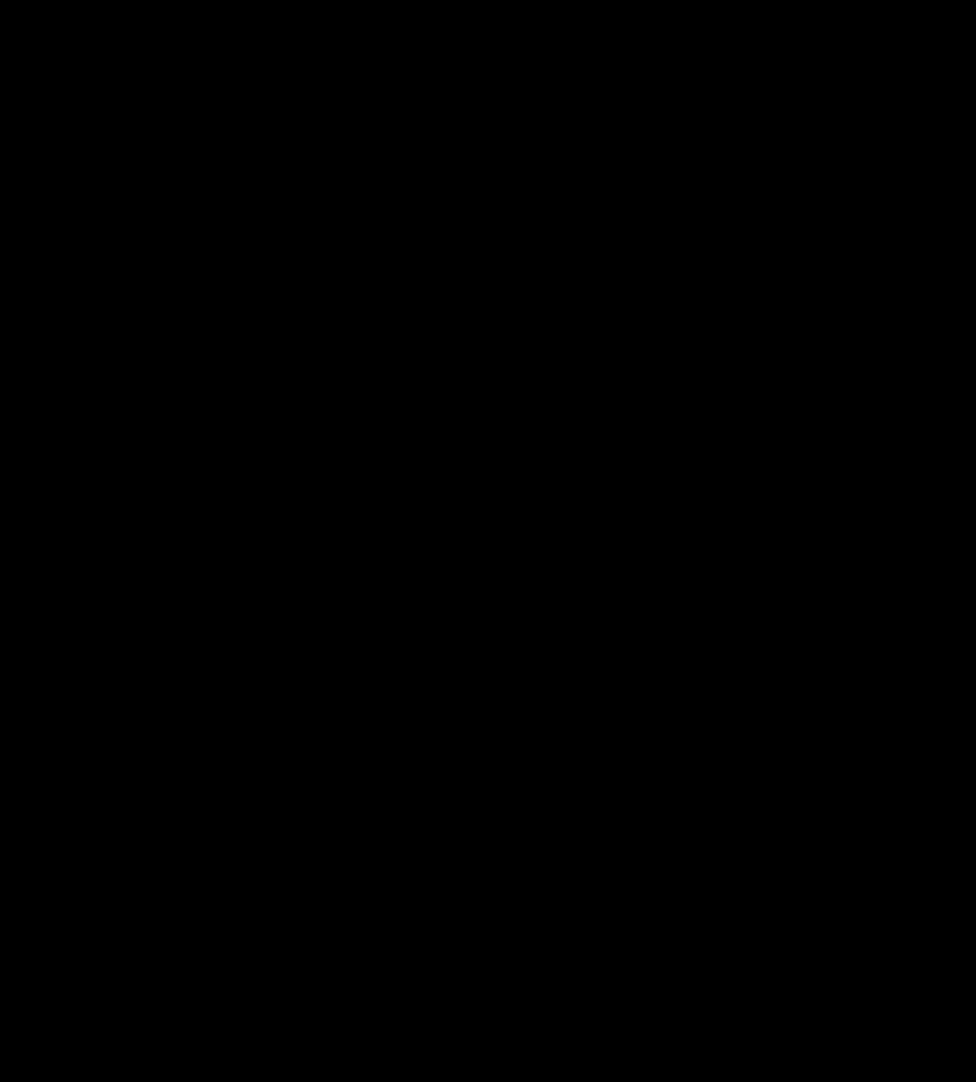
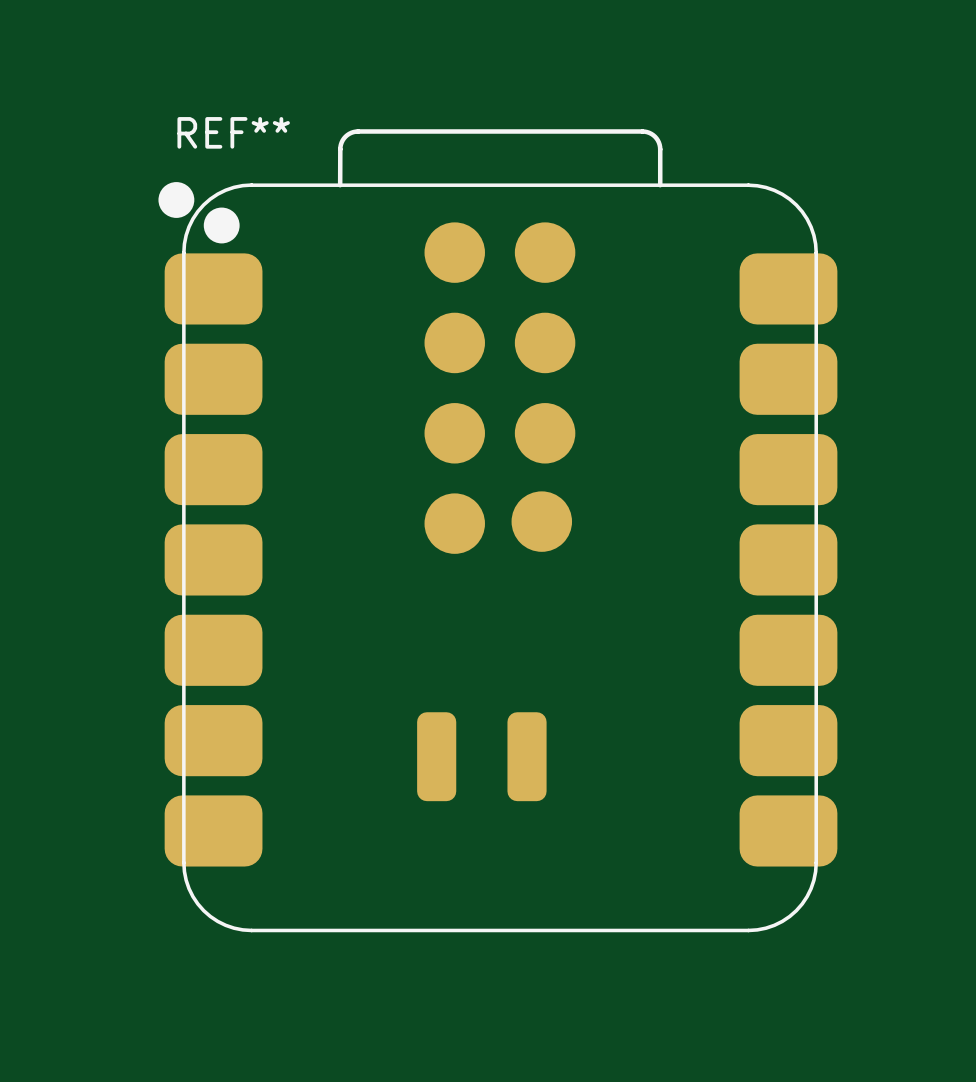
REF**: none -> (497, 530)

